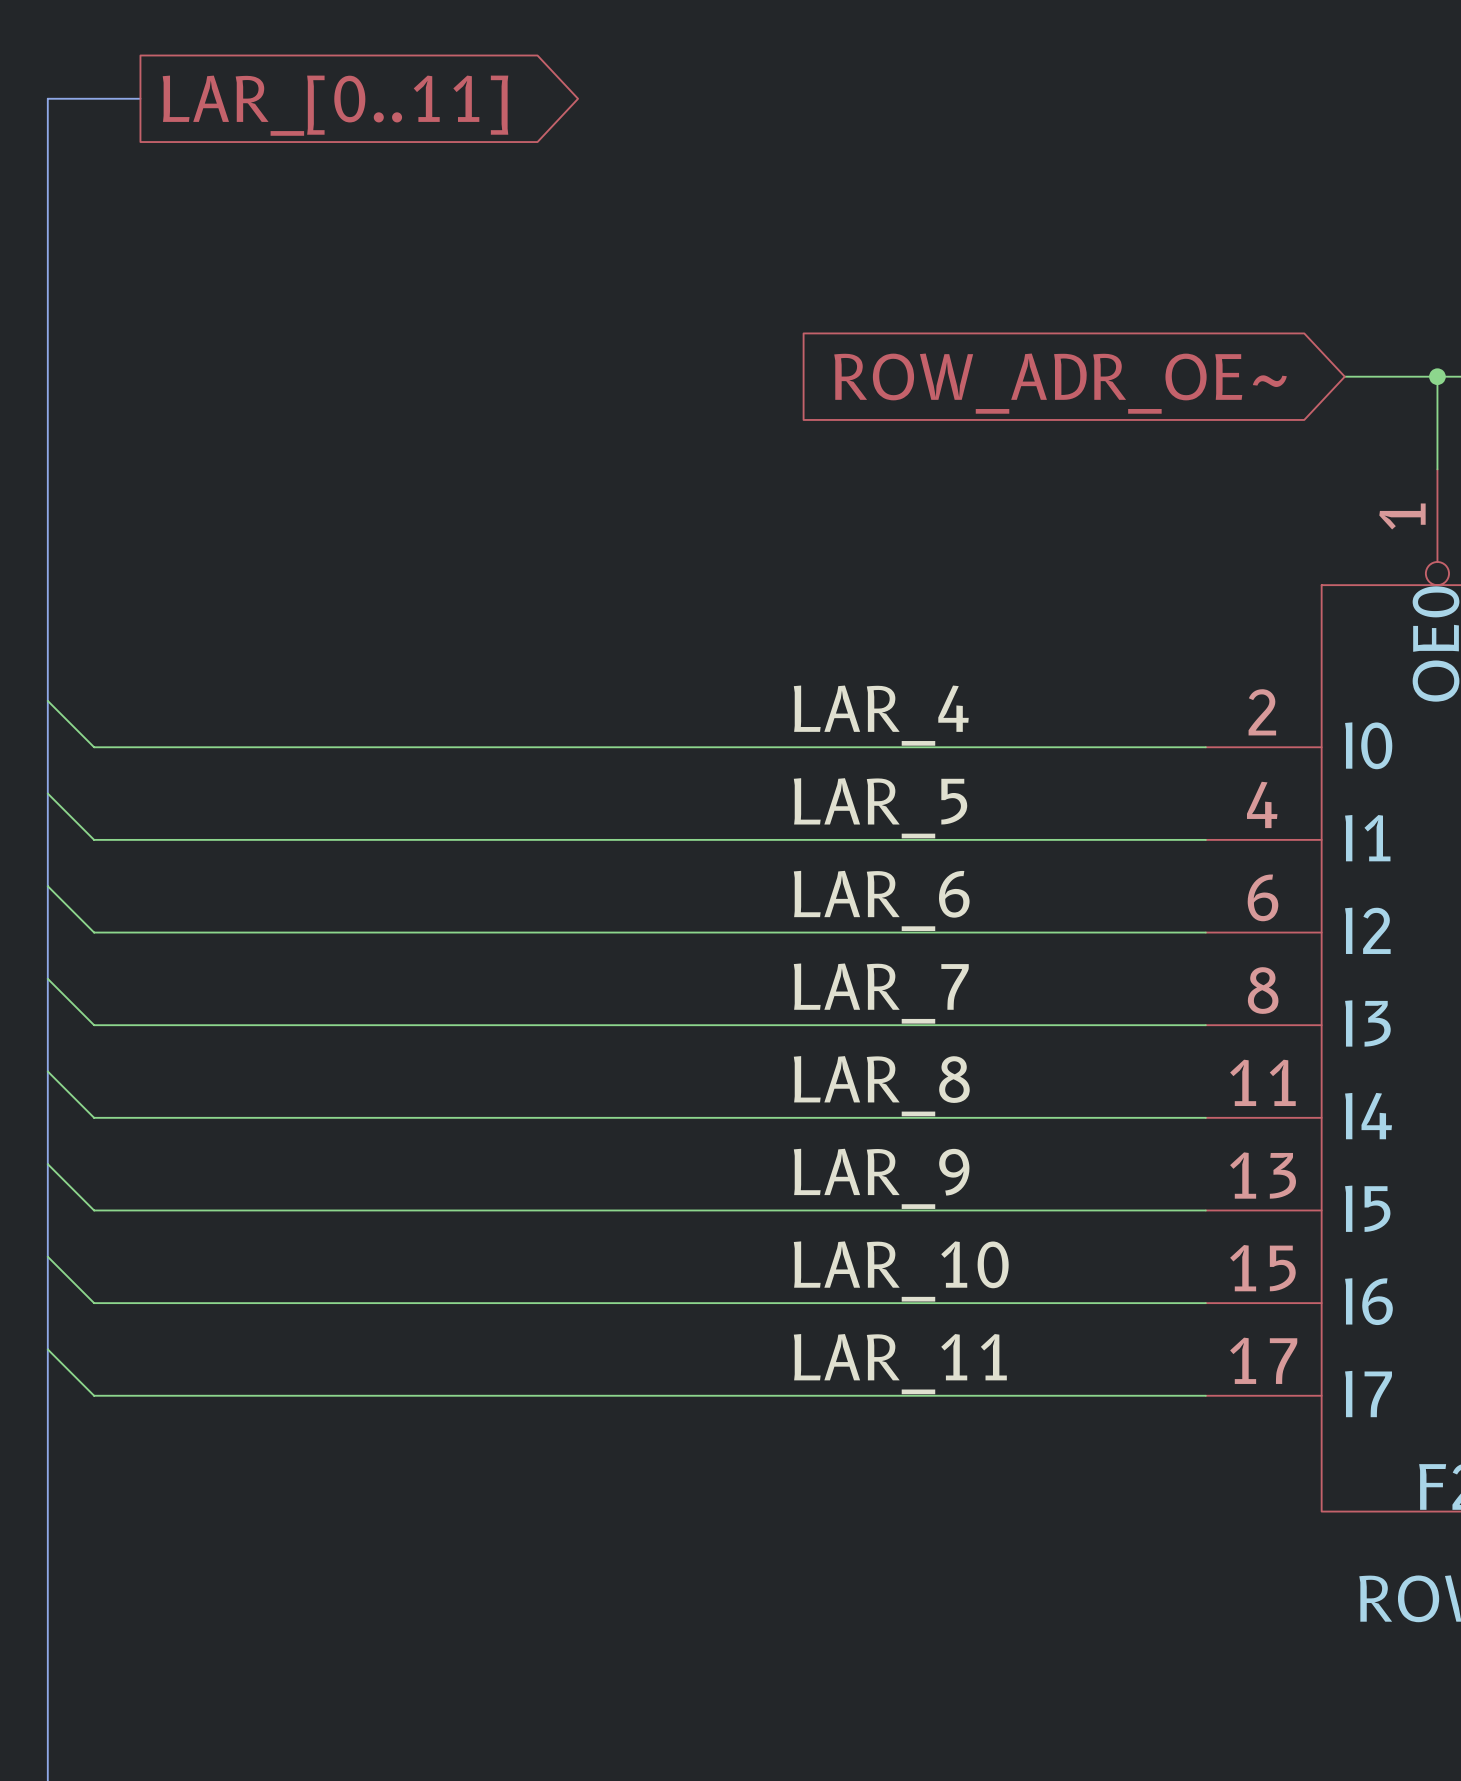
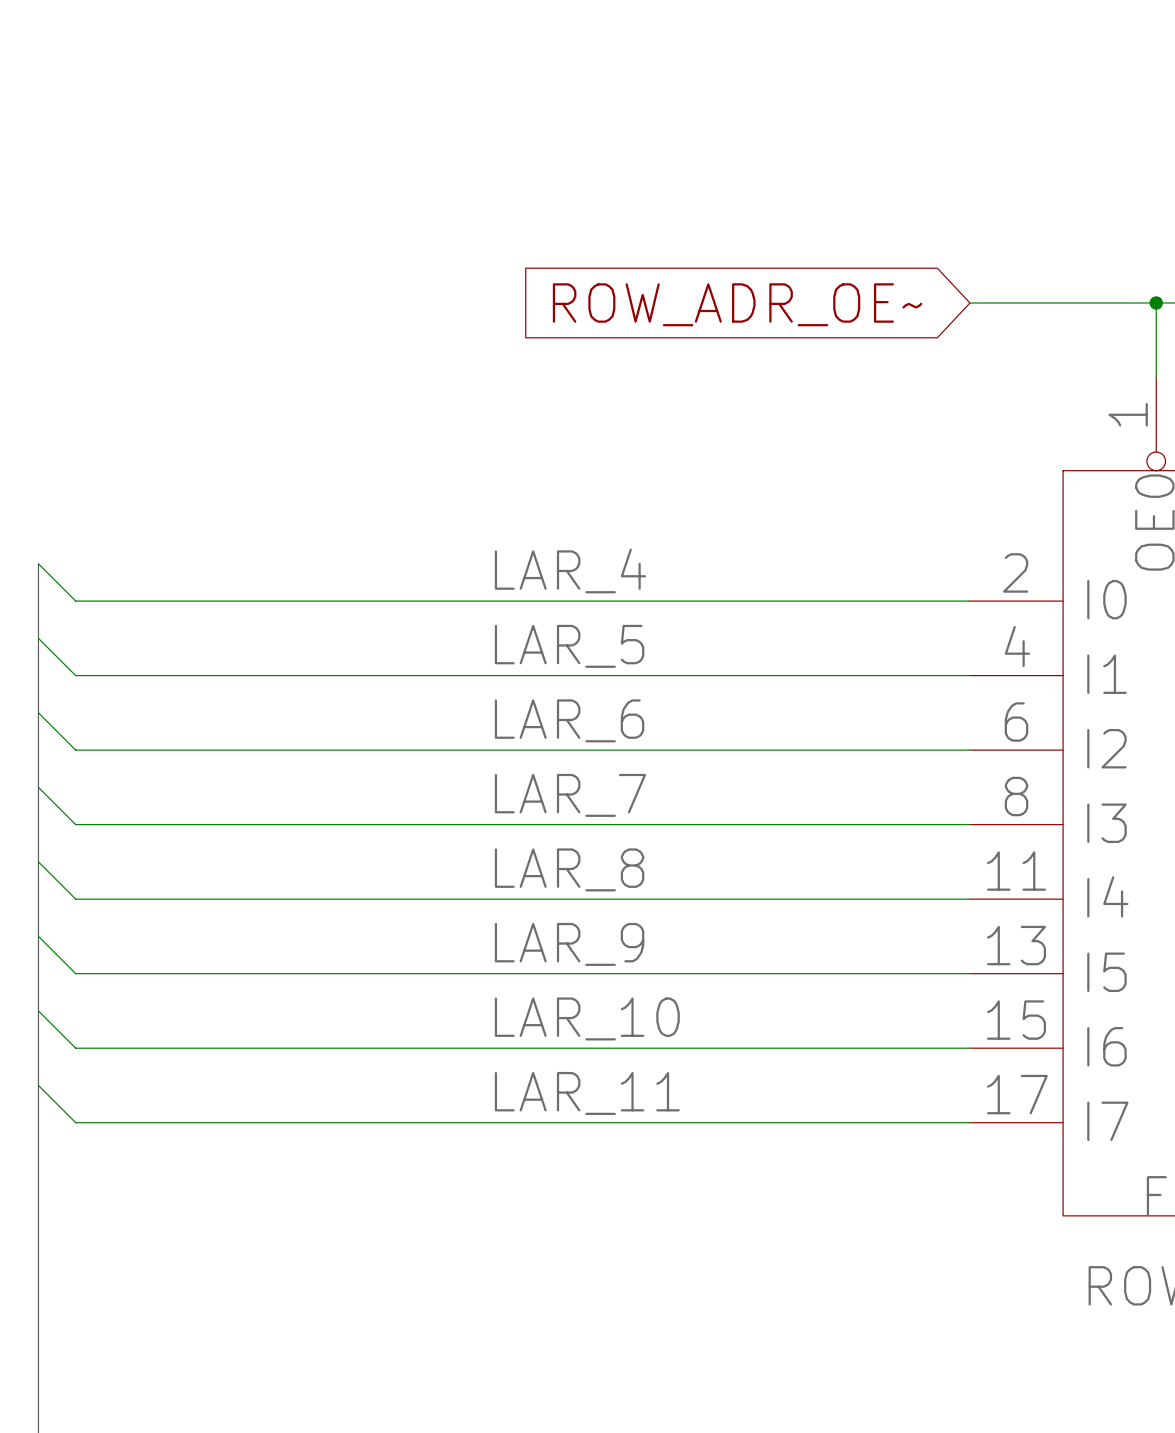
bus: (140, 98) (47, 98) (47, 700) -> none
global label: LAR_[0..11] (335, 105) -> none
wire: none -> (969, 303) (1081, 303)
global label position: ROW_ADR_OE~ (1060, 383) -> ROW_ADR_OE~ (737, 304)
label position: LAR_4 (881, 715) -> LAR_4 (570, 570)
label position: LAR_5 (880, 808) -> LAR_5 (569, 646)
label position: LAR_6 (881, 900) -> LAR_6 (569, 720)
label position: LAR_7 (881, 993) -> LAR_7 (570, 795)
label position: LAR_8 (881, 1086) -> LAR_8 (569, 869)
label position: LAR_9 (881, 1178) -> LAR_9 (569, 944)
label position: LAR_10 (901, 1271) -> LAR_10 (587, 1018)
label position: LAR_11 (900, 1364) -> LAR_11 (587, 1093)

